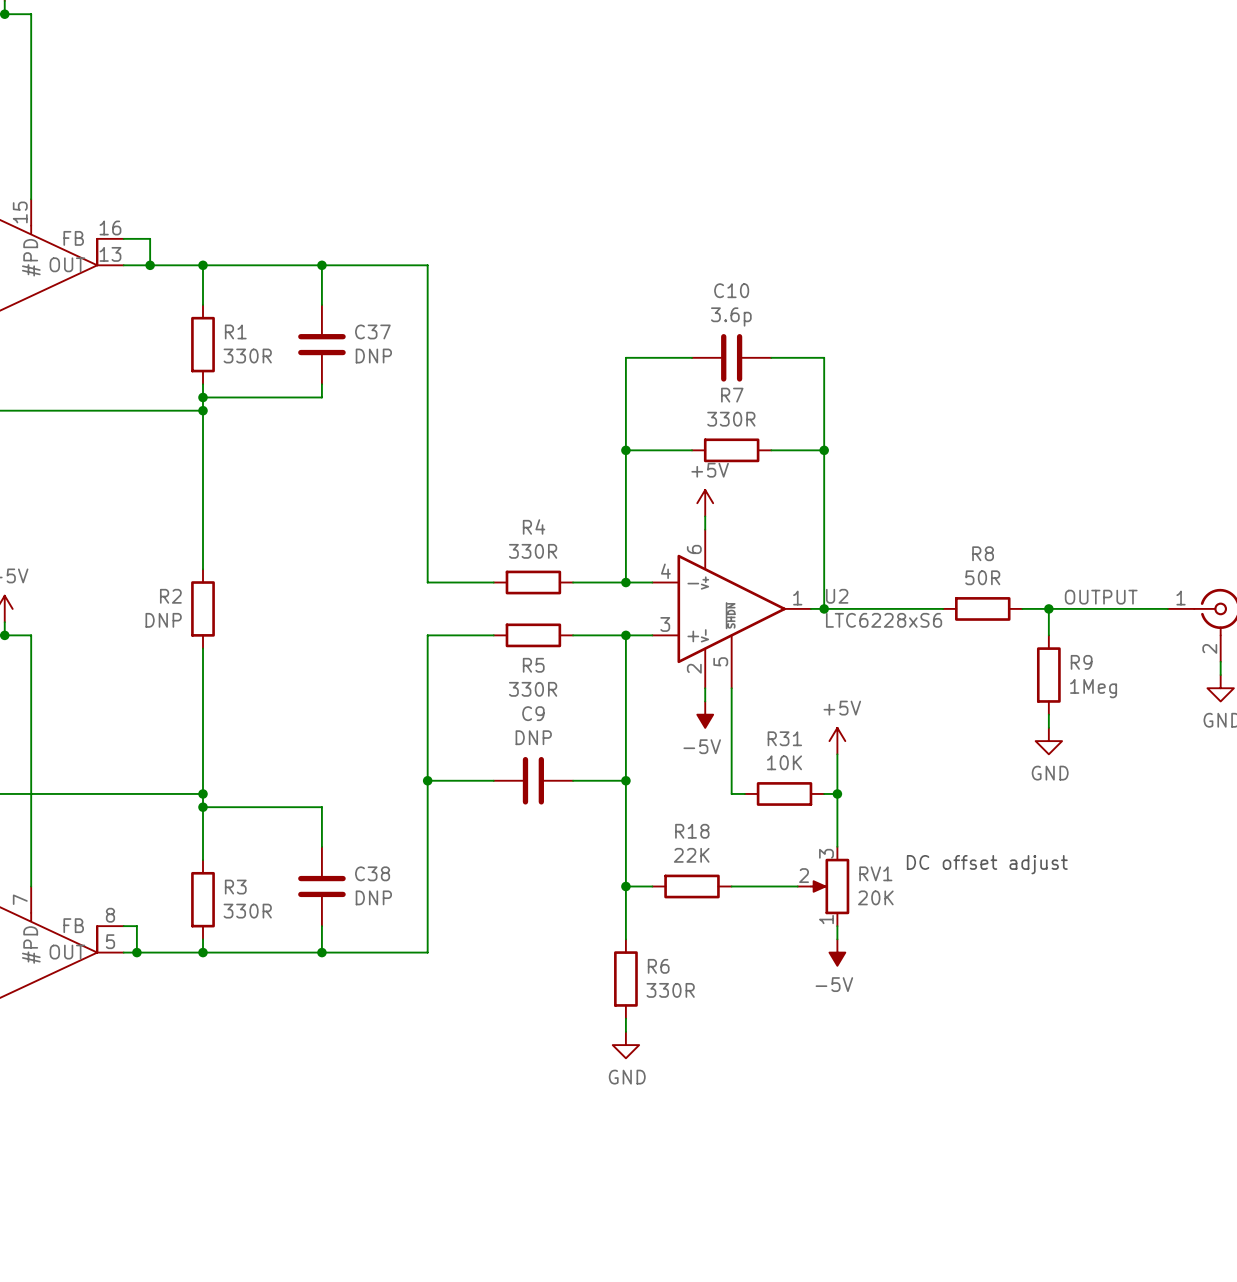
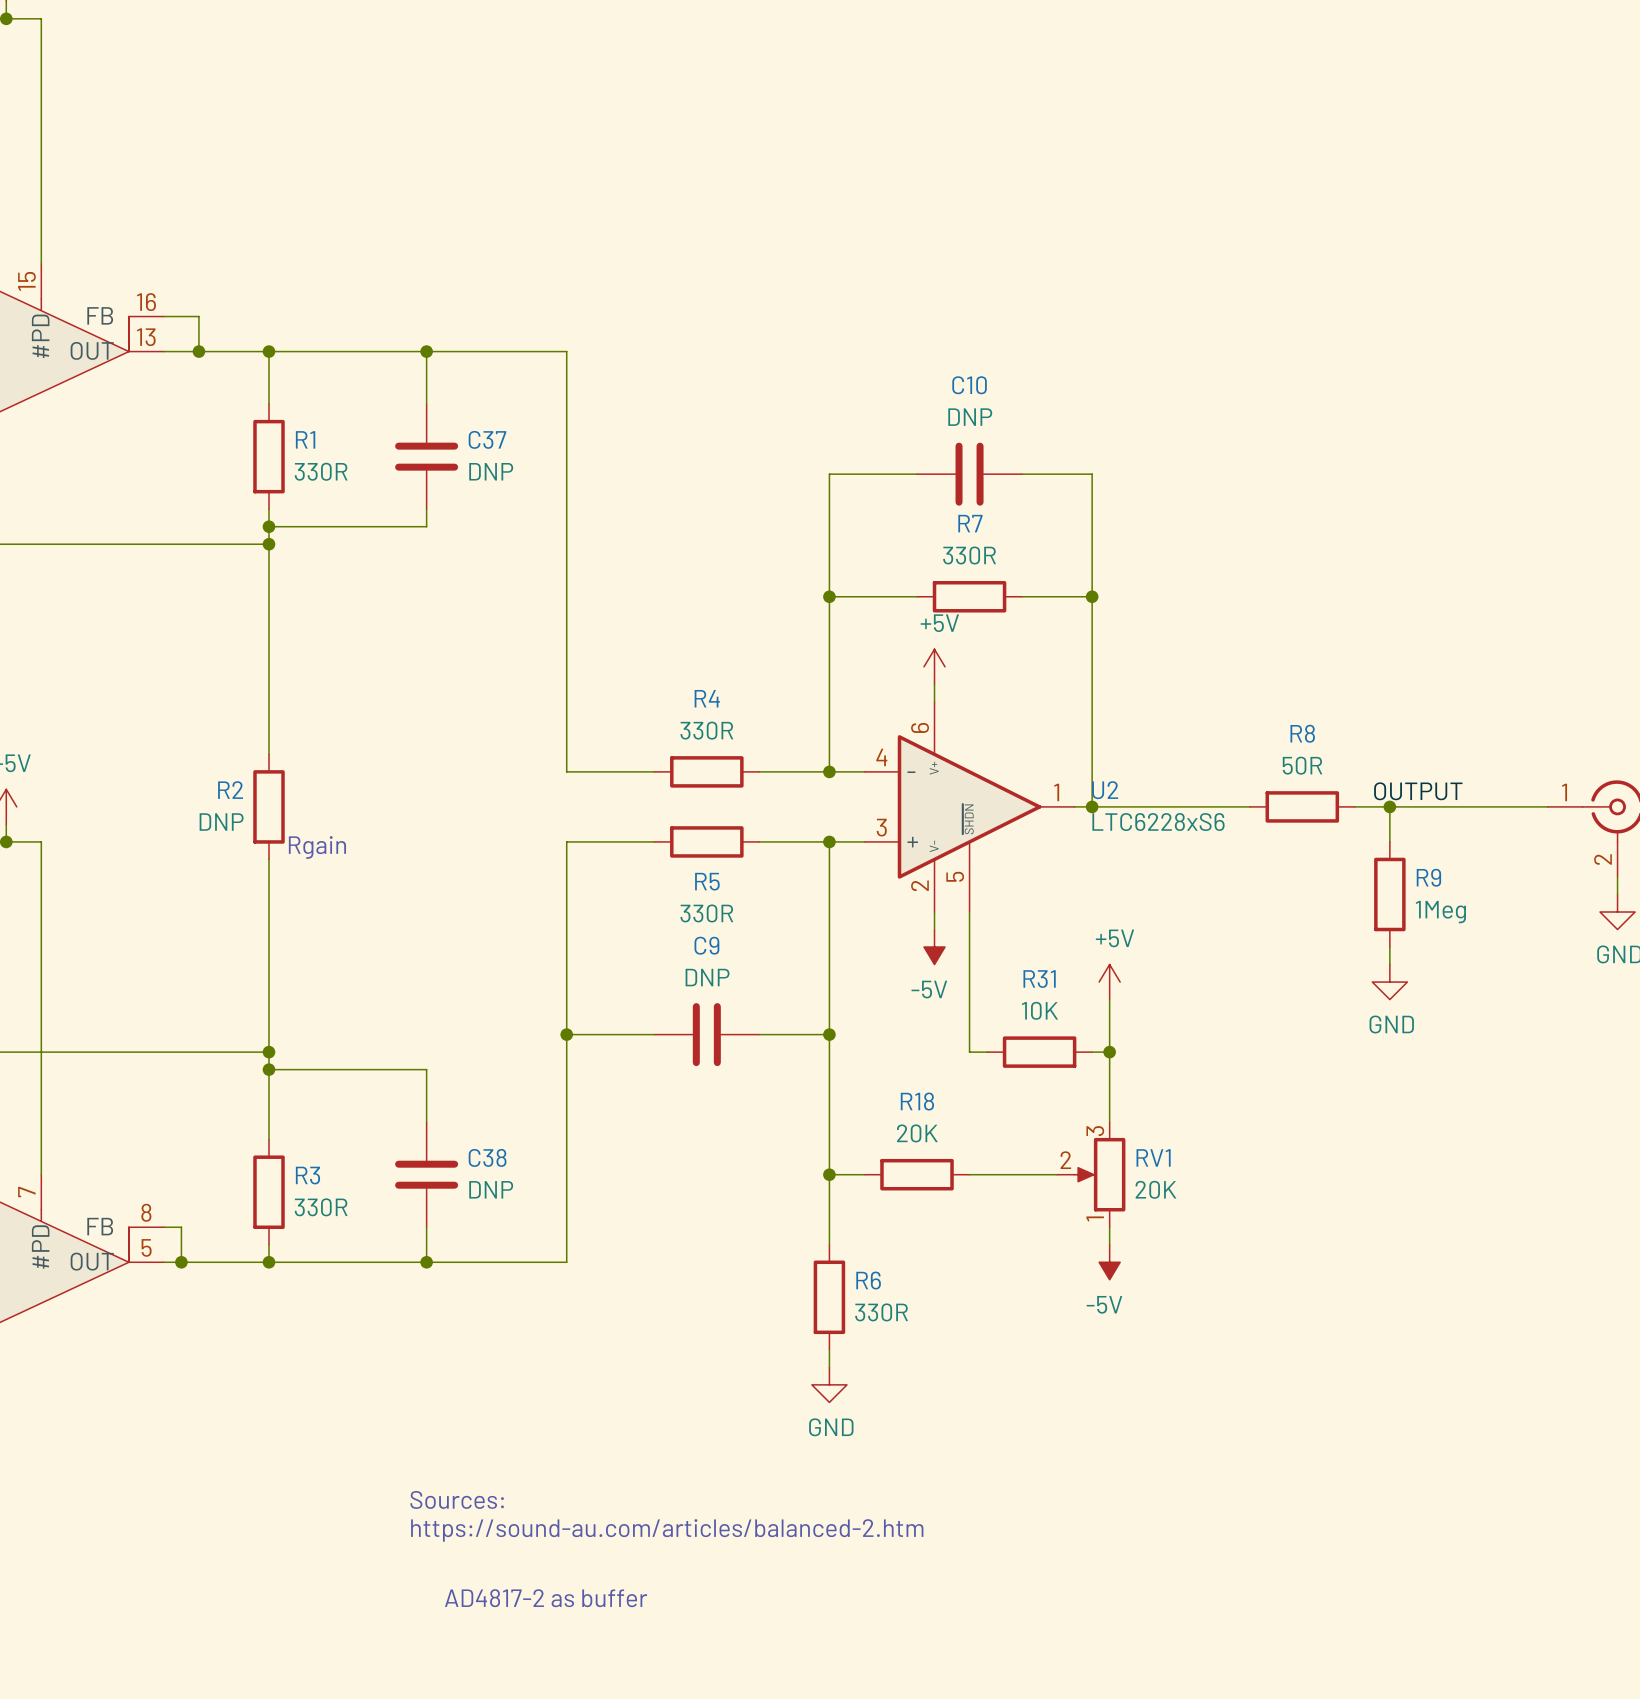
C10 value: 3.6p (731, 316) -> DNP (970, 417)
label position: OUTPUT (1101, 597) -> OUTPUT (1418, 791)
text: none -> Rgain (317, 847)
R18 value: 22K (691, 855) -> 20K (917, 1133)
text: DC offset adjust (987, 864) -> none
text: none -> Sources: (457, 1499)
text: none -> https://sound-au.com/articles/balanced-2.htm (667, 1530)
text: none -> AD4817-2 as buffer (546, 1598)

